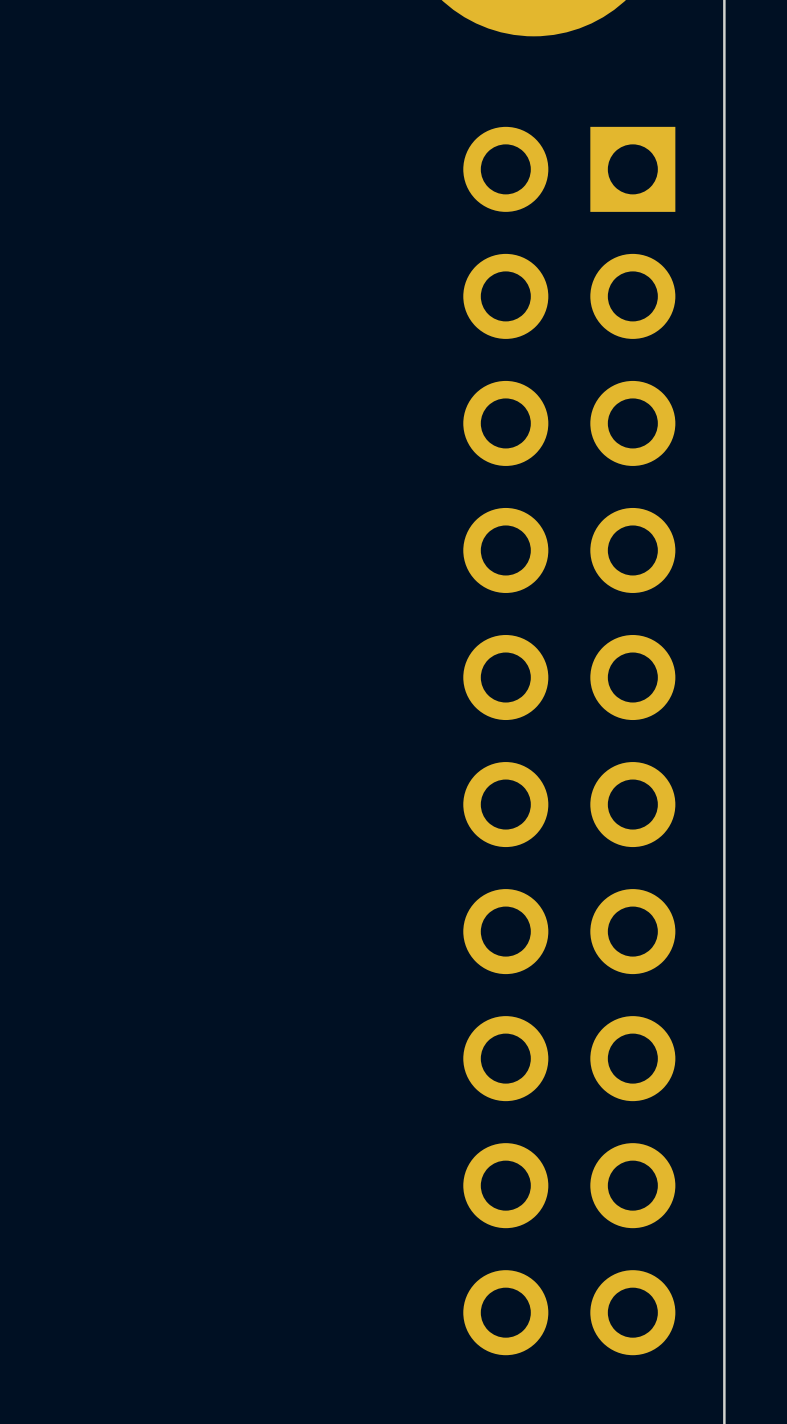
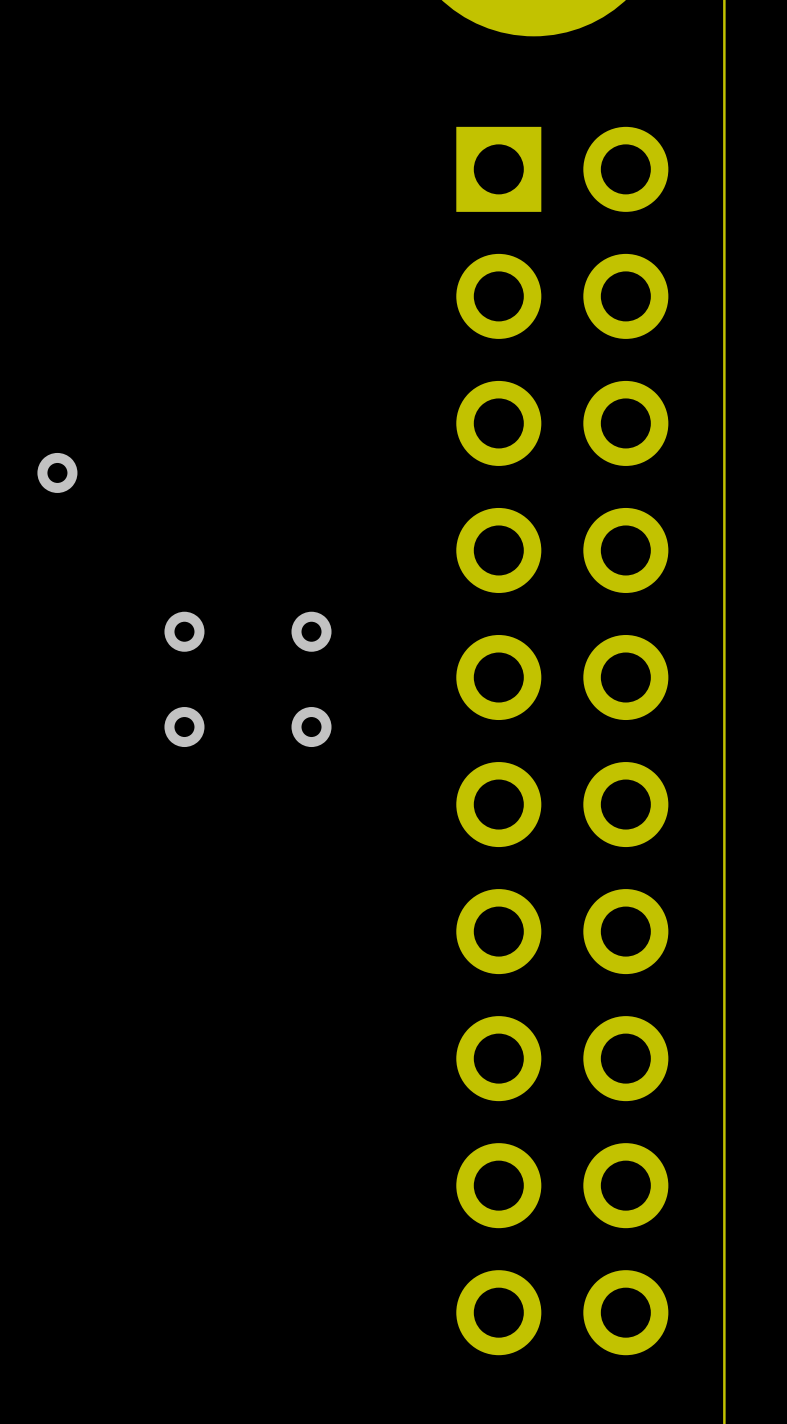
part footprint: [463, 126, 676, 1356] -> [456, 126, 669, 1356]
via: none -> (57, 472)
via: none -> (184, 631)
via: none -> (311, 631)
via: none -> (184, 727)
via: none -> (311, 727)

